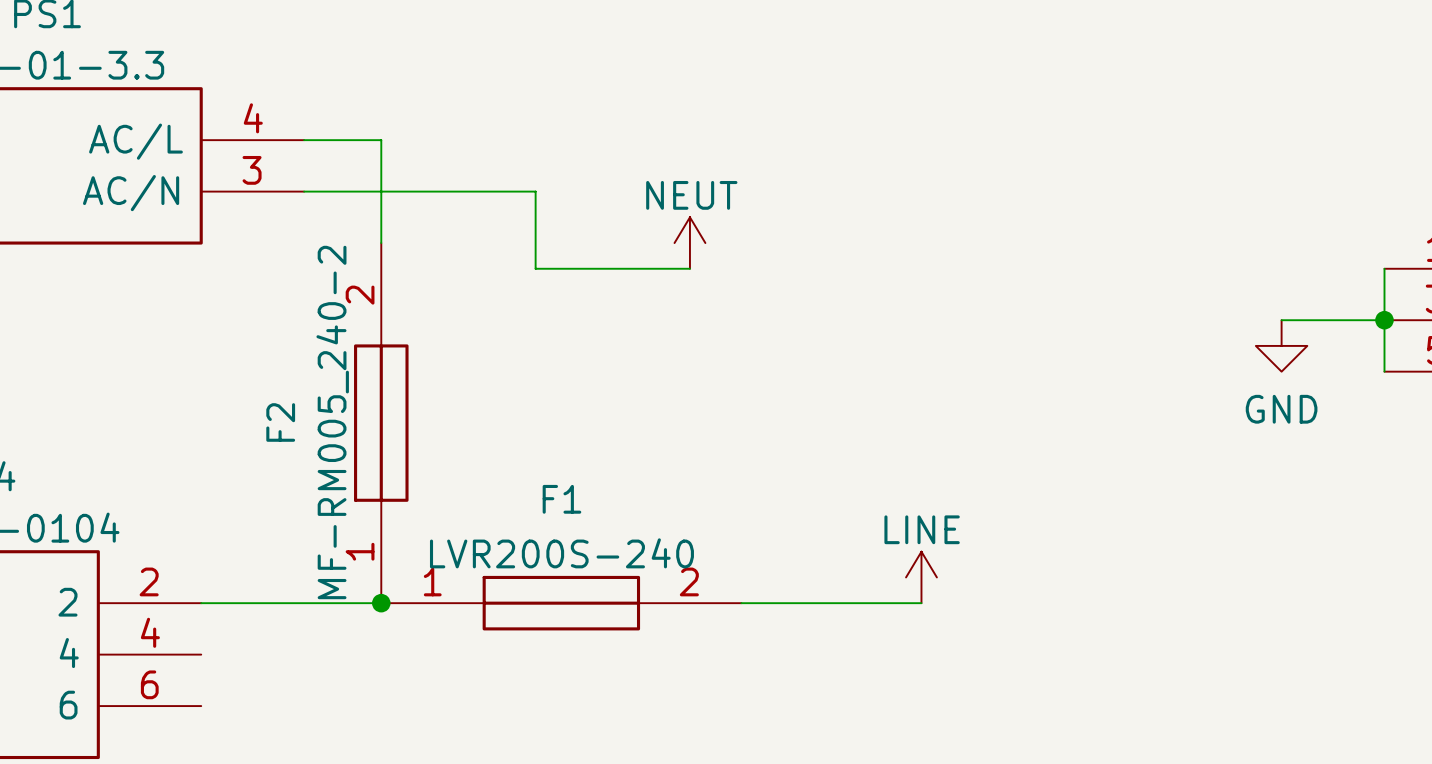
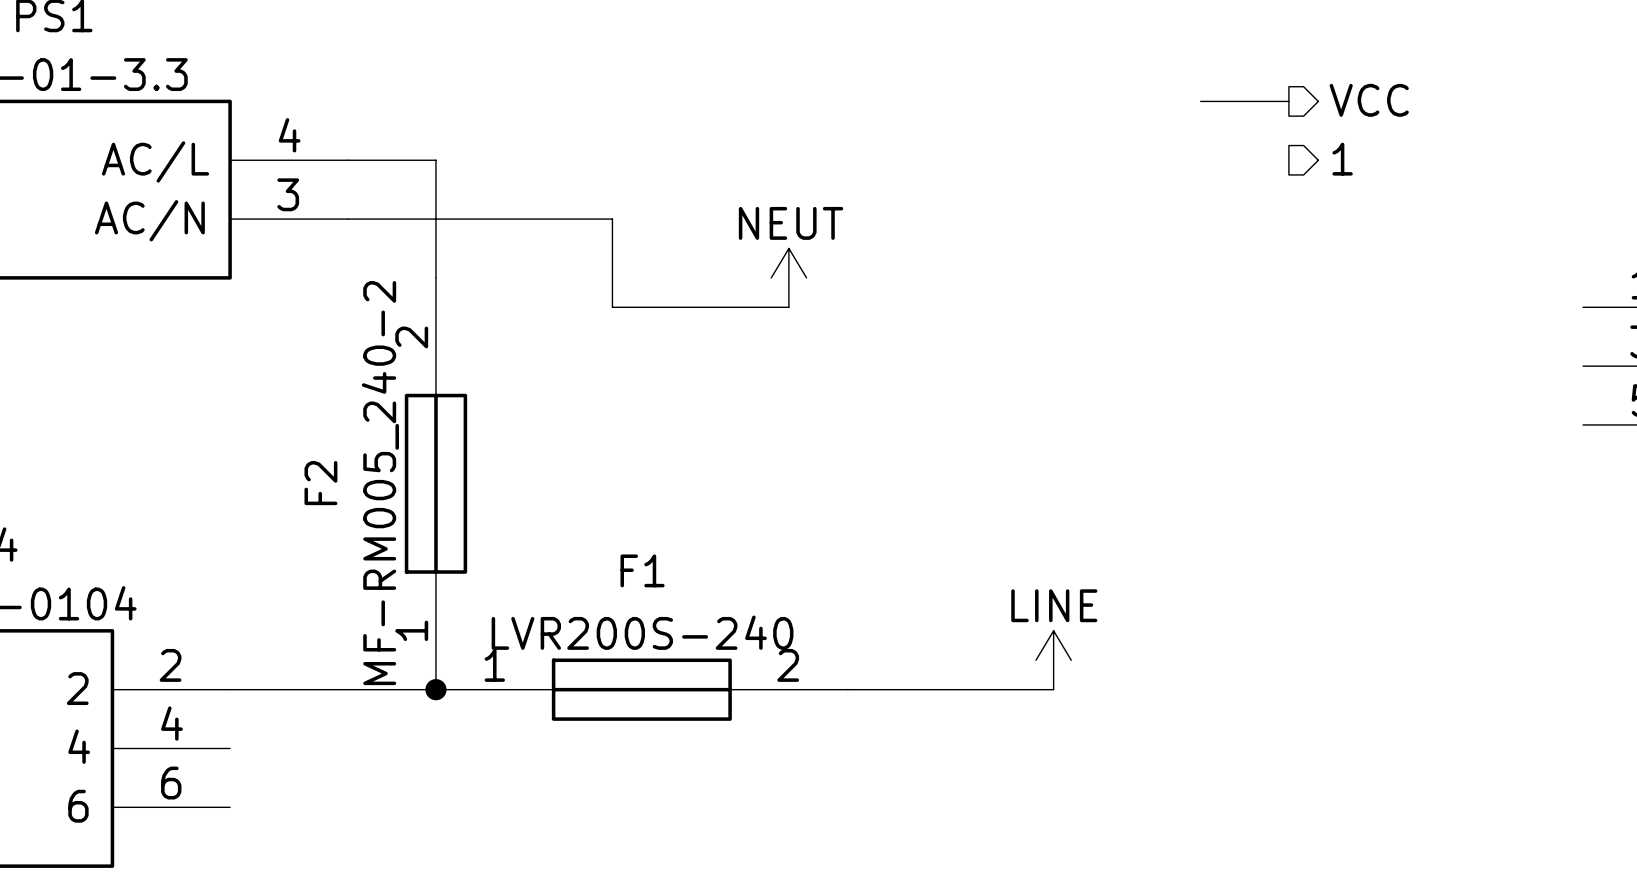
sheet pin: none -> VCC (1369, 100)
wire: none -> (1200, 101) (1288, 101)
sheet pin: none -> 1 (1342, 159)
wire: (1384, 268) (1384, 371) -> none
wire: (1281, 320) (1384, 320) -> none
junction: (1384, 320) -> none
power symbol: GND (1281, 345) -> none

